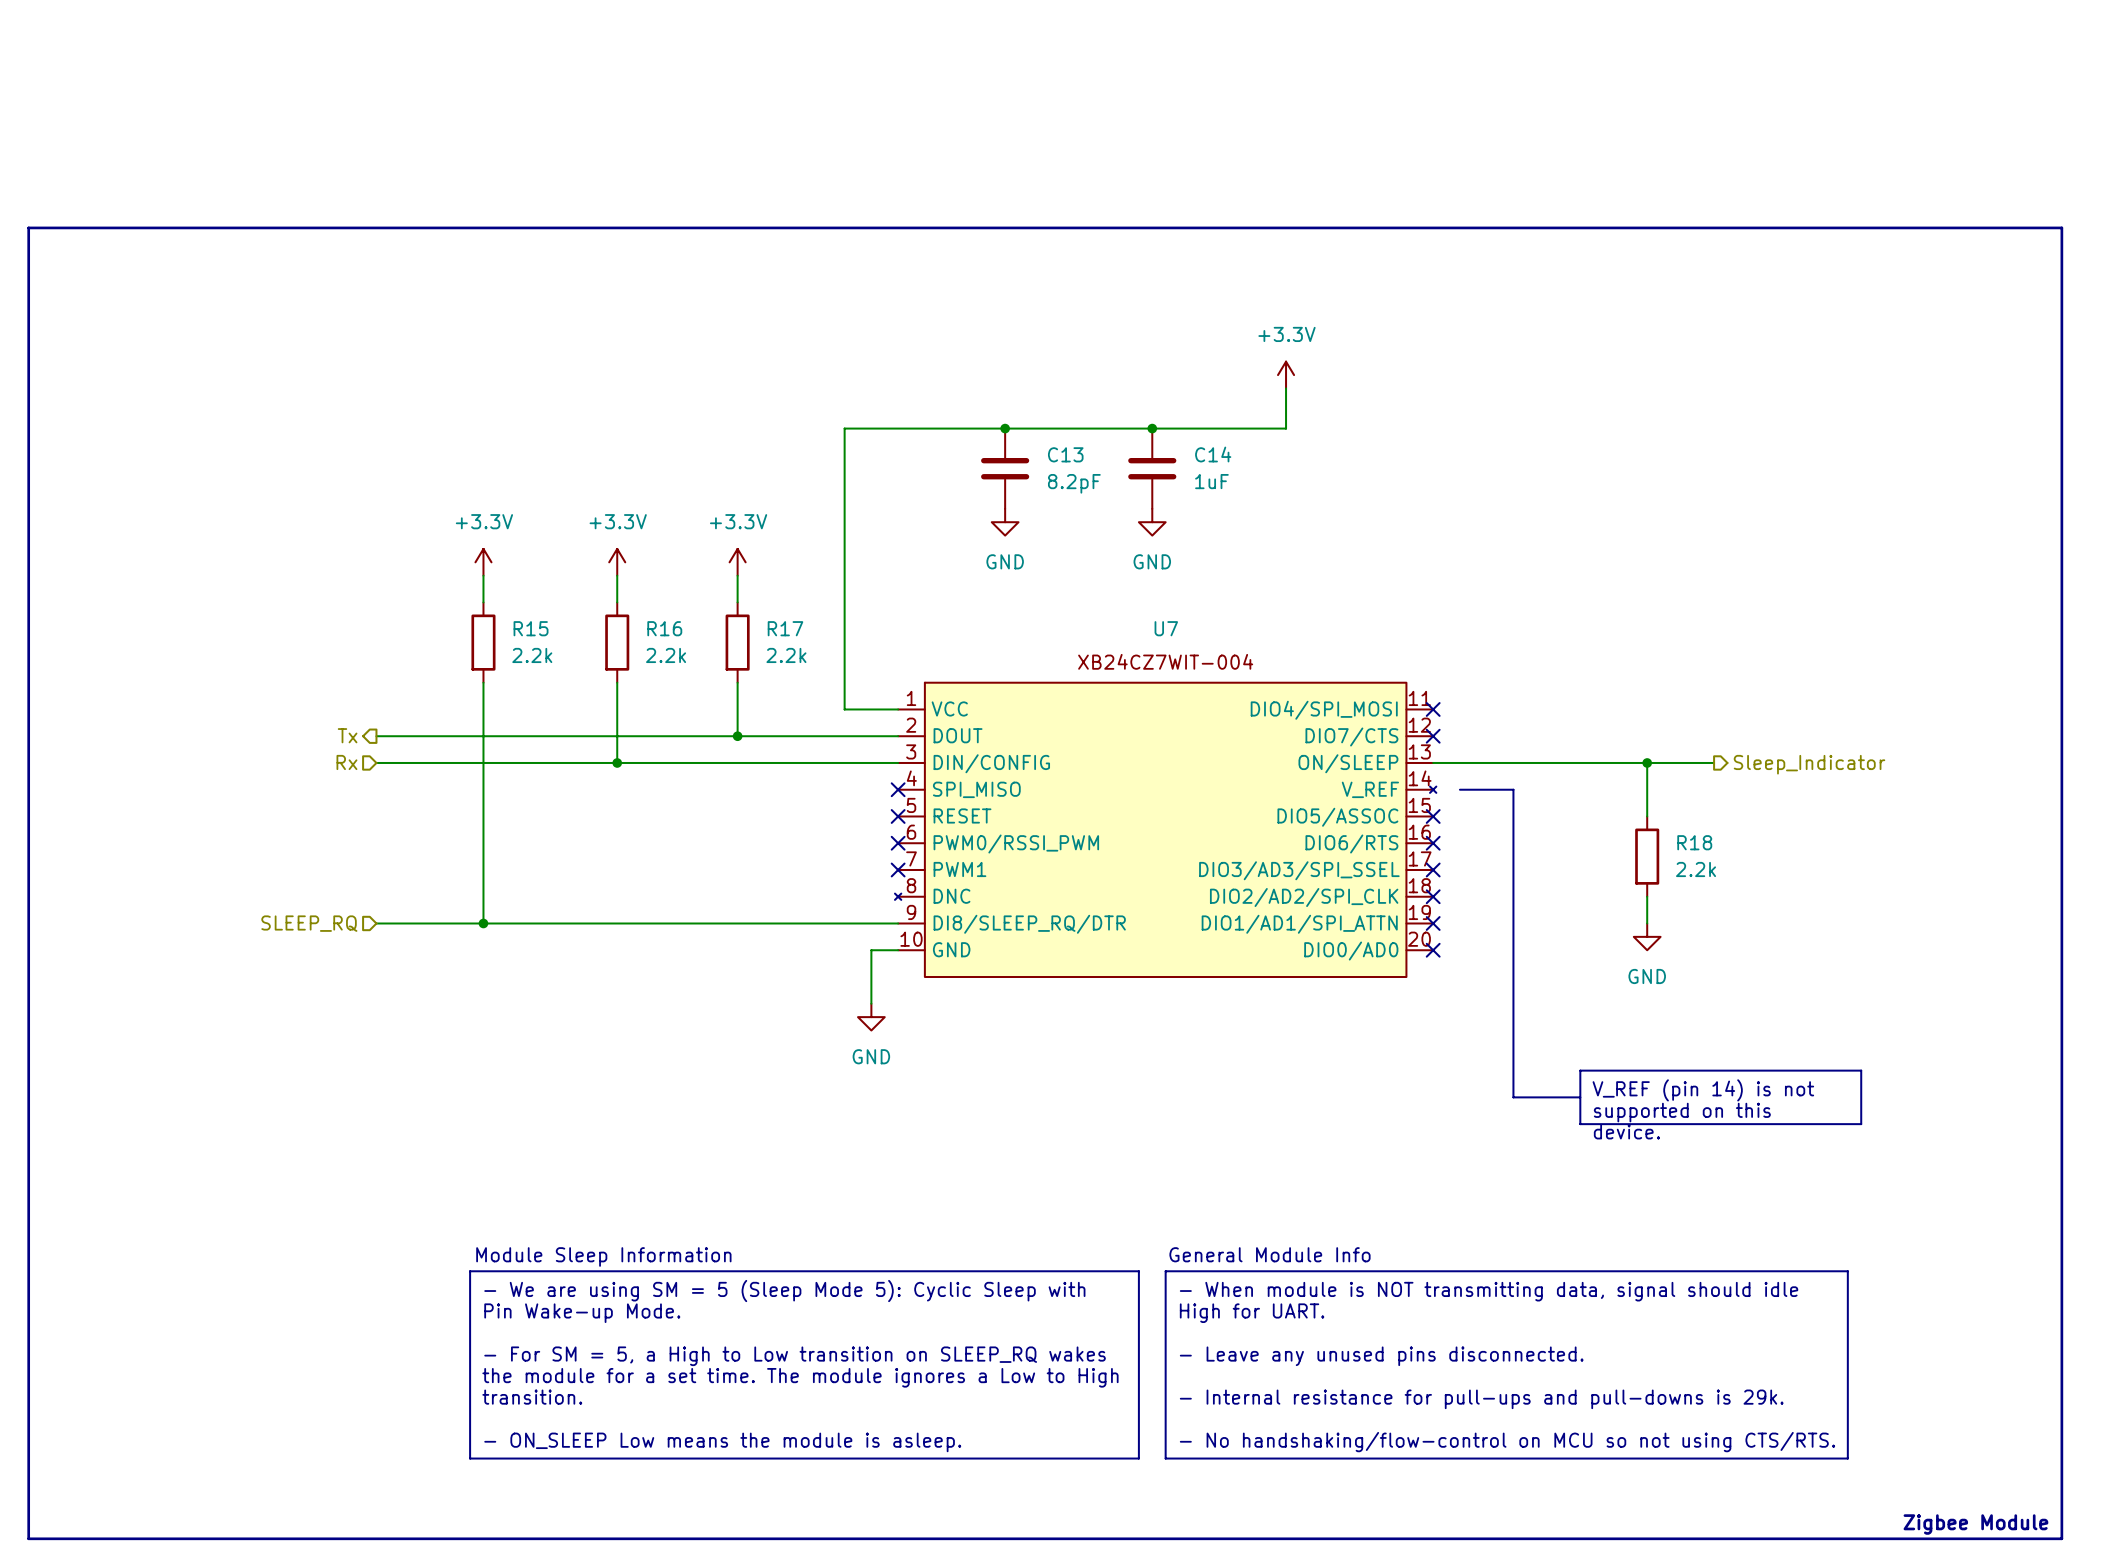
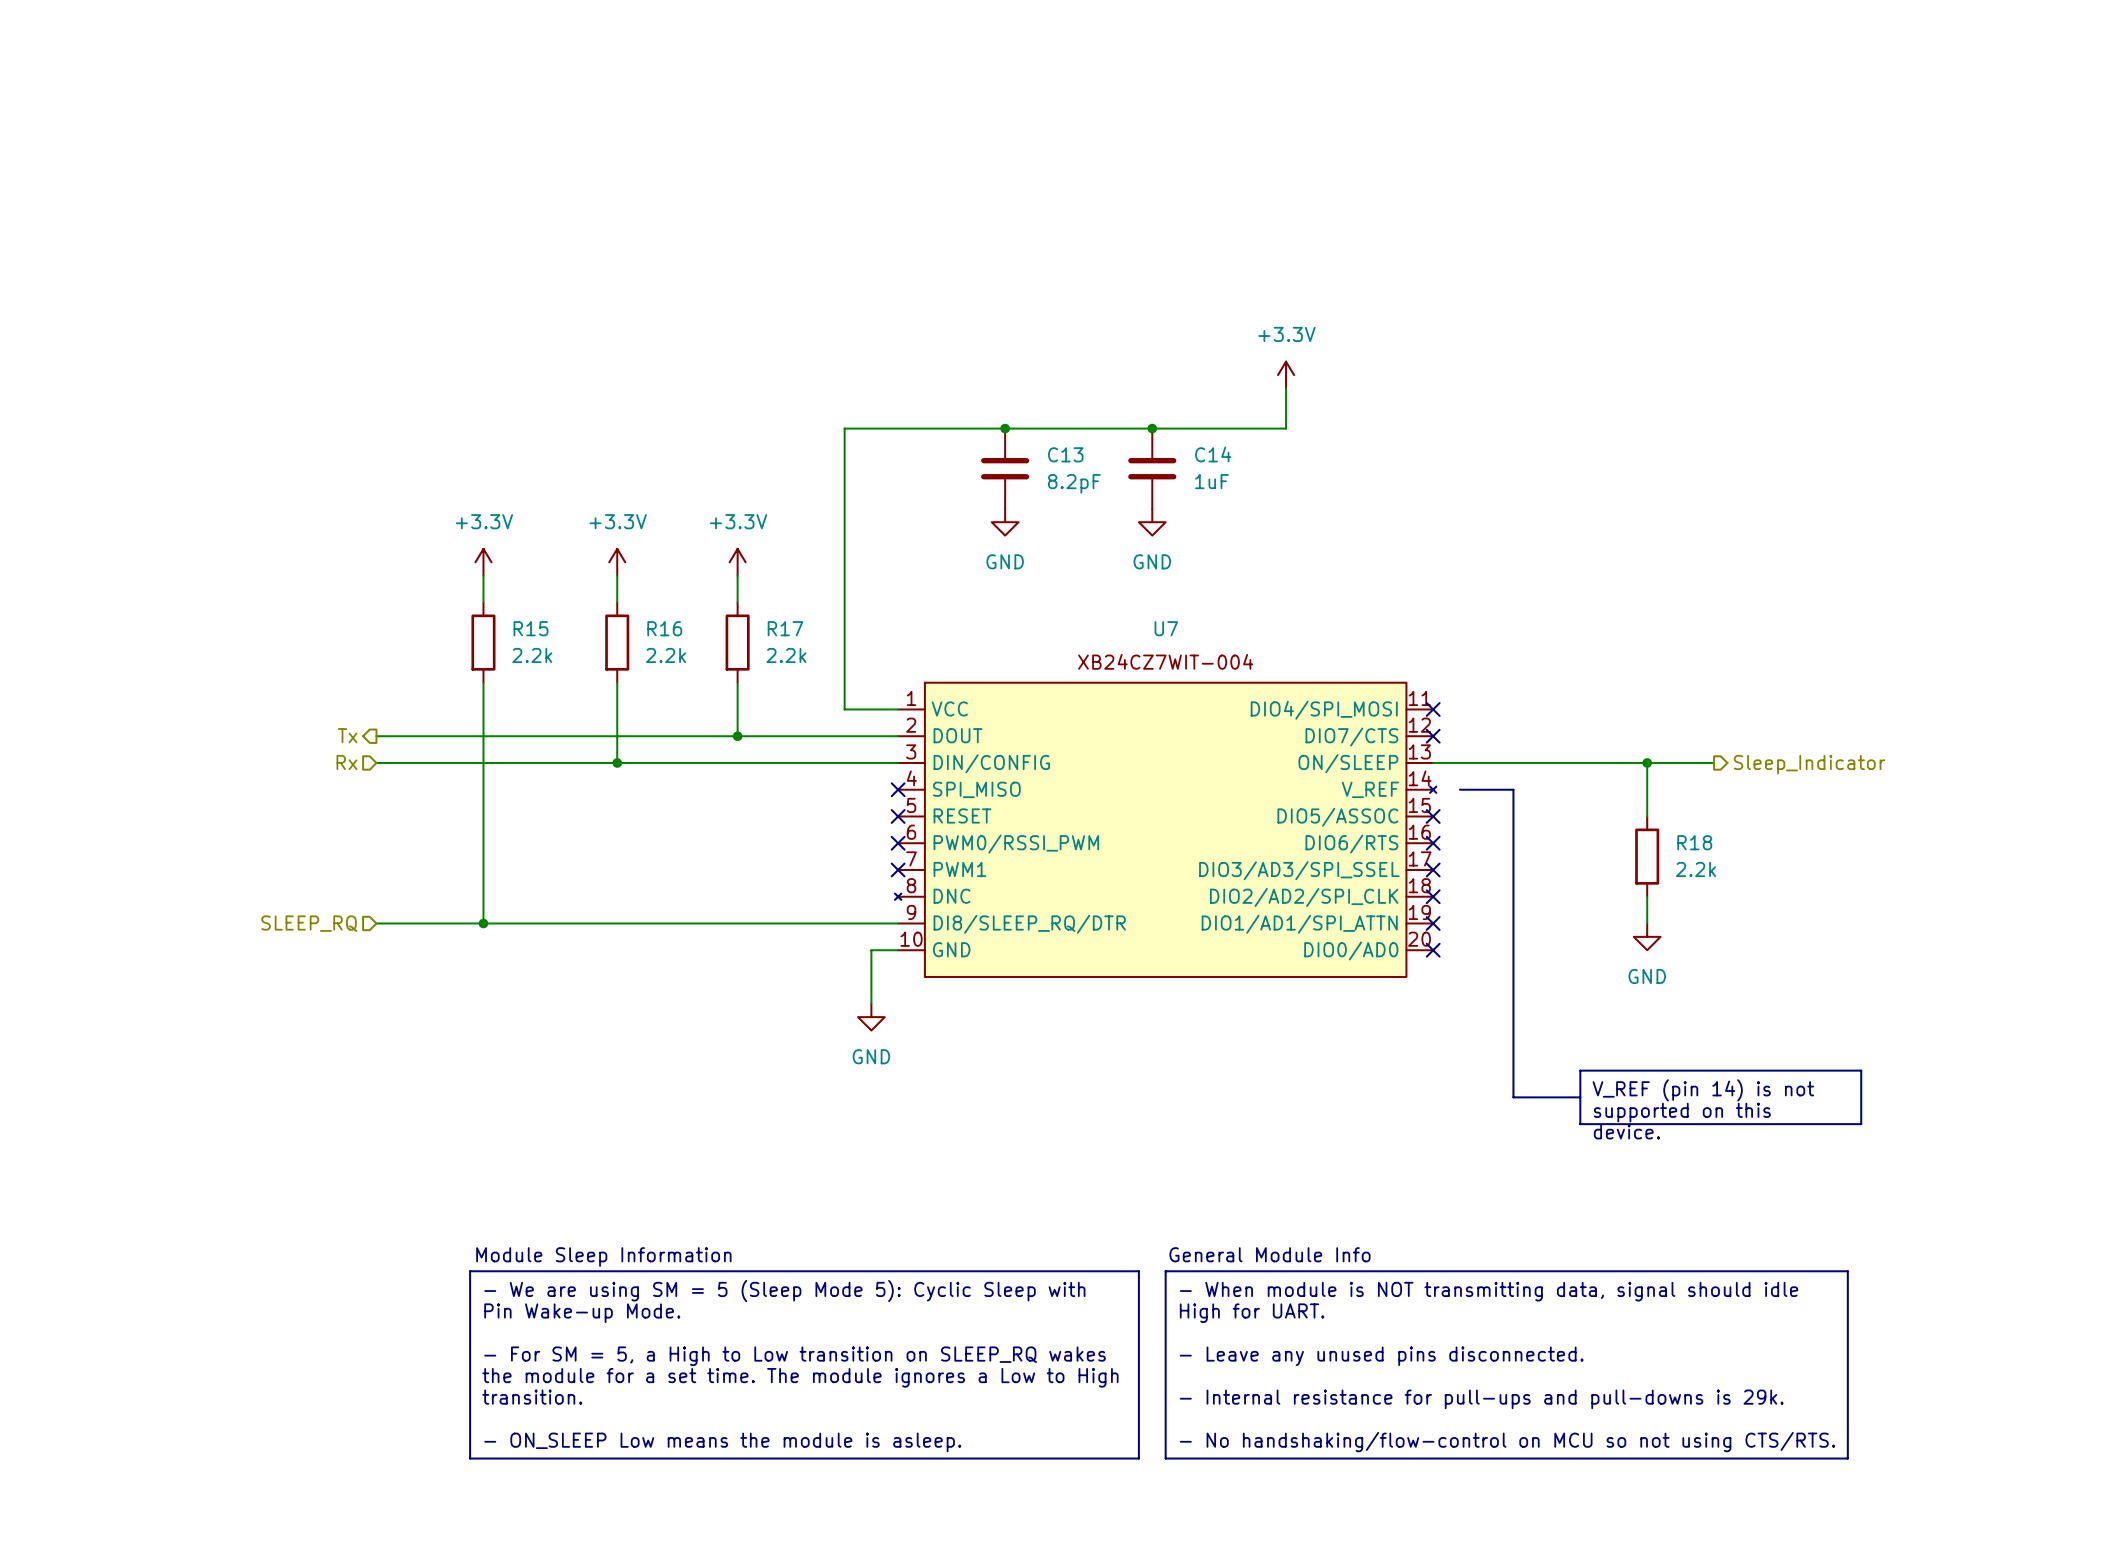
line: (28, 227) (2061, 227) (2061, 1538) (28, 1538) (28, 227) -> none
text: Zigbee Module (1975, 1524) -> none

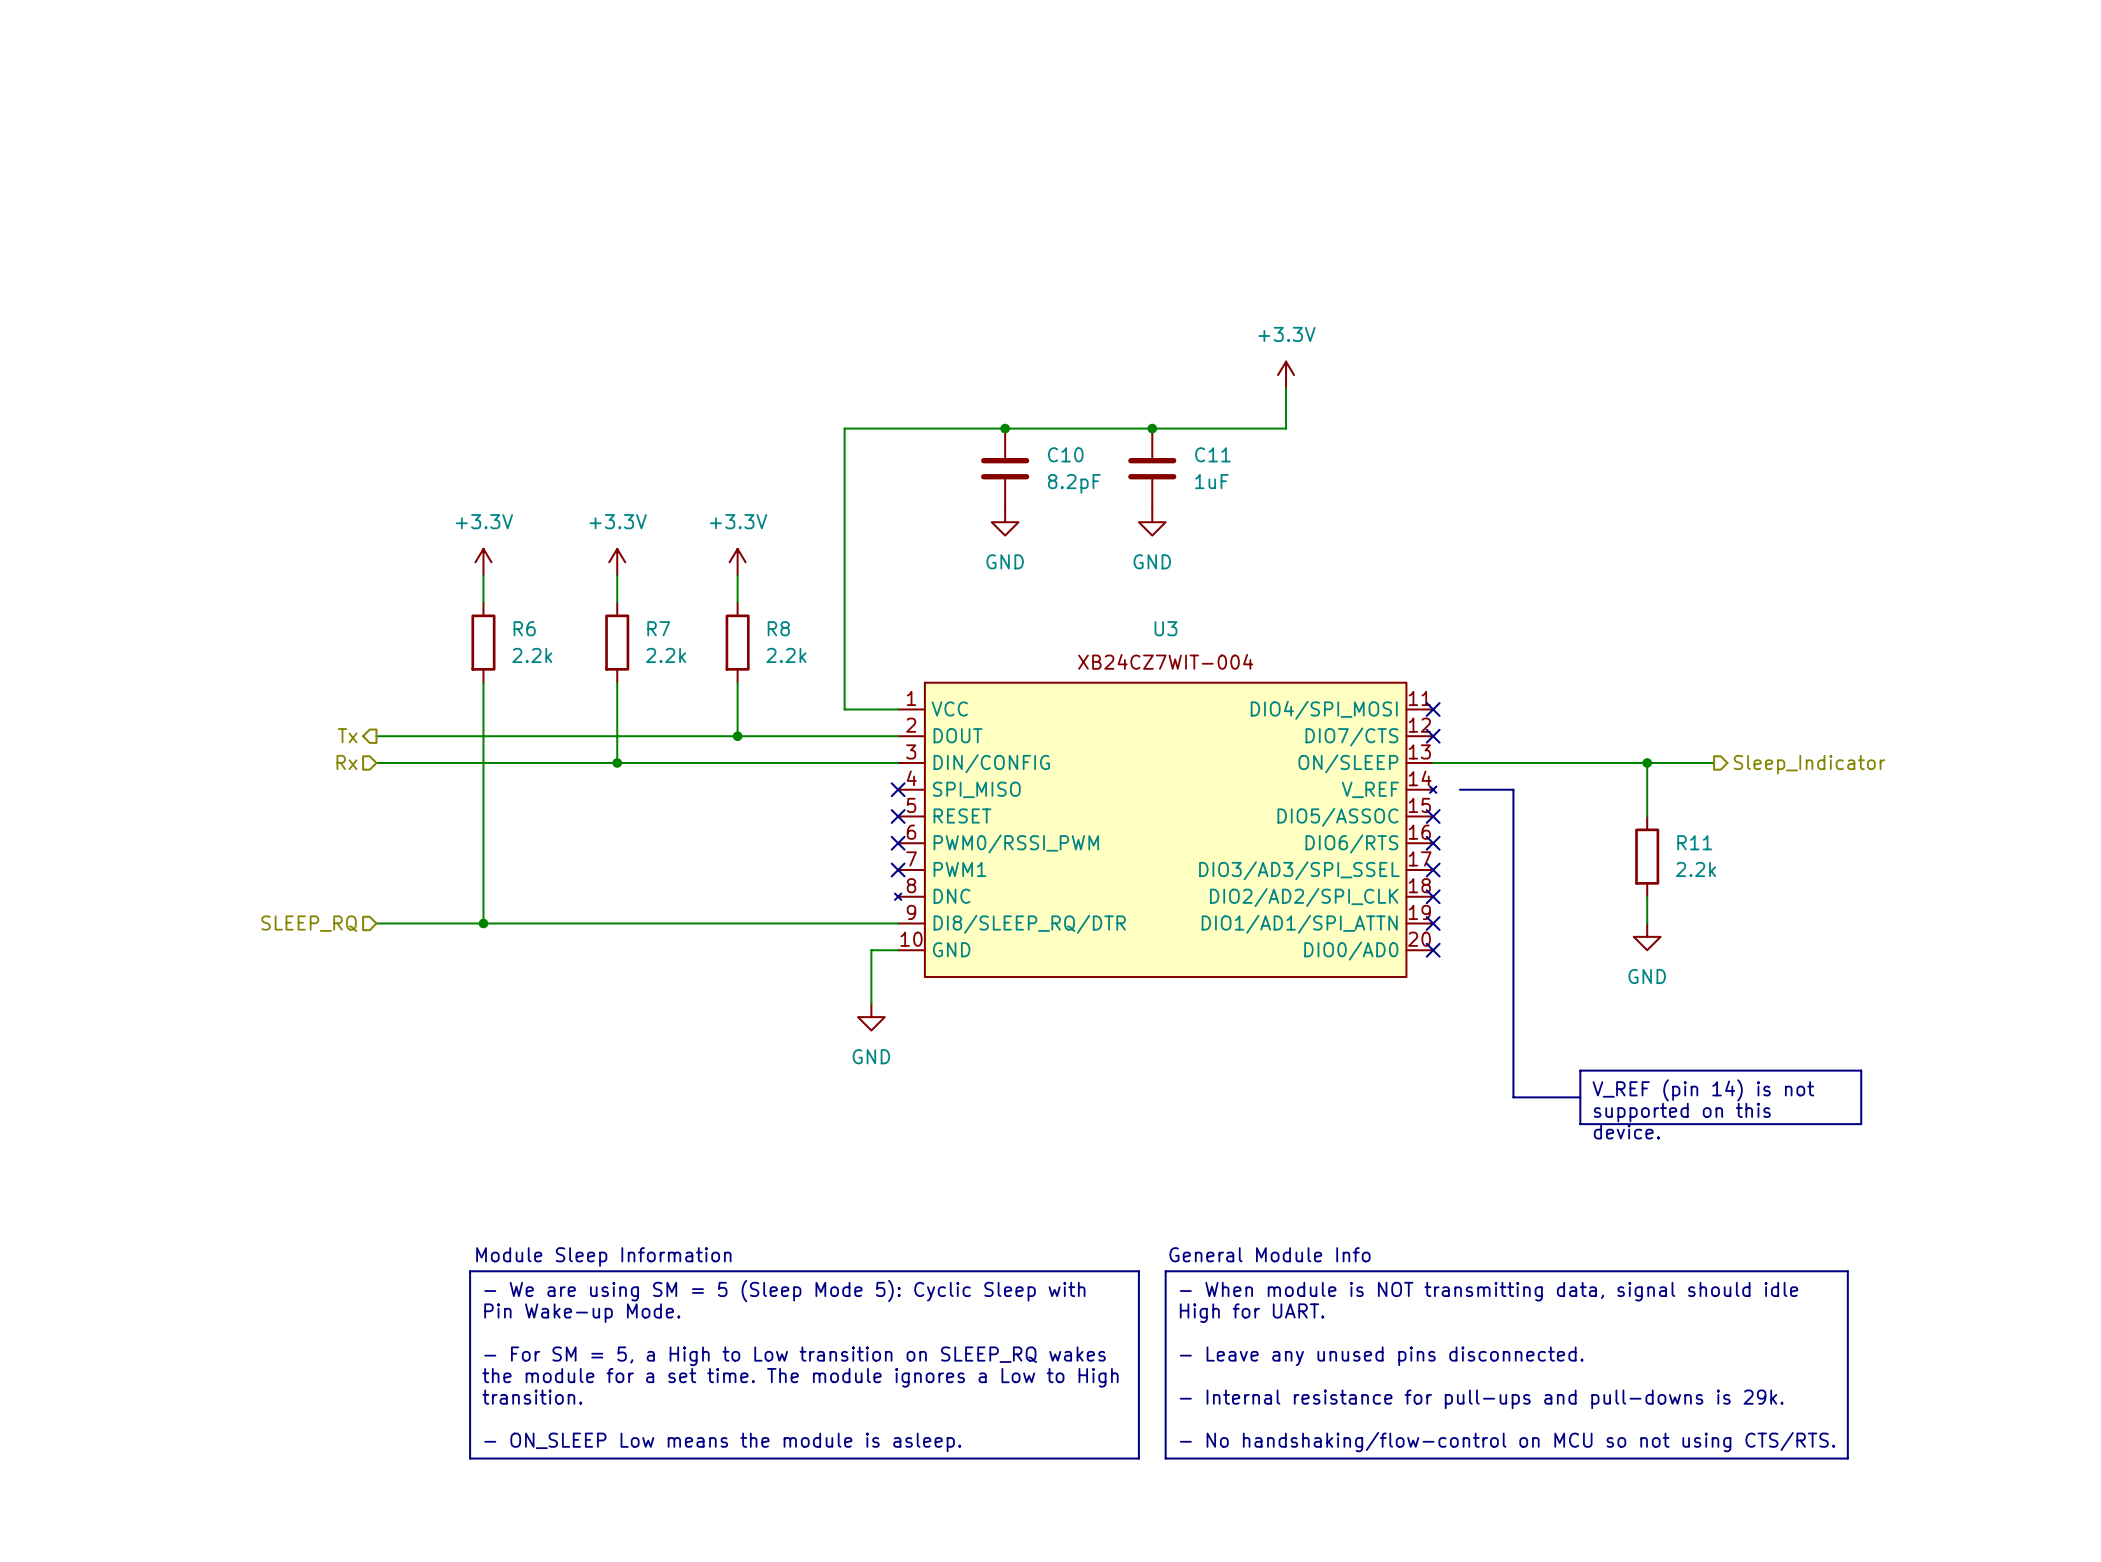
C13 name: C13 (1065, 454) -> C10 (1065, 454)
C14 name: C14 (1213, 454) -> C11 (1212, 454)
R15 name: R15 (531, 628) -> R6 (524, 628)
R16 name: R16 (664, 628) -> R7 (658, 628)
R17 name: R17 (785, 628) -> R8 (778, 628)
U7 name: U7 (1166, 628) -> U3 (1165, 628)
R18 name: R18 (1694, 842) -> R11 (1694, 842)

